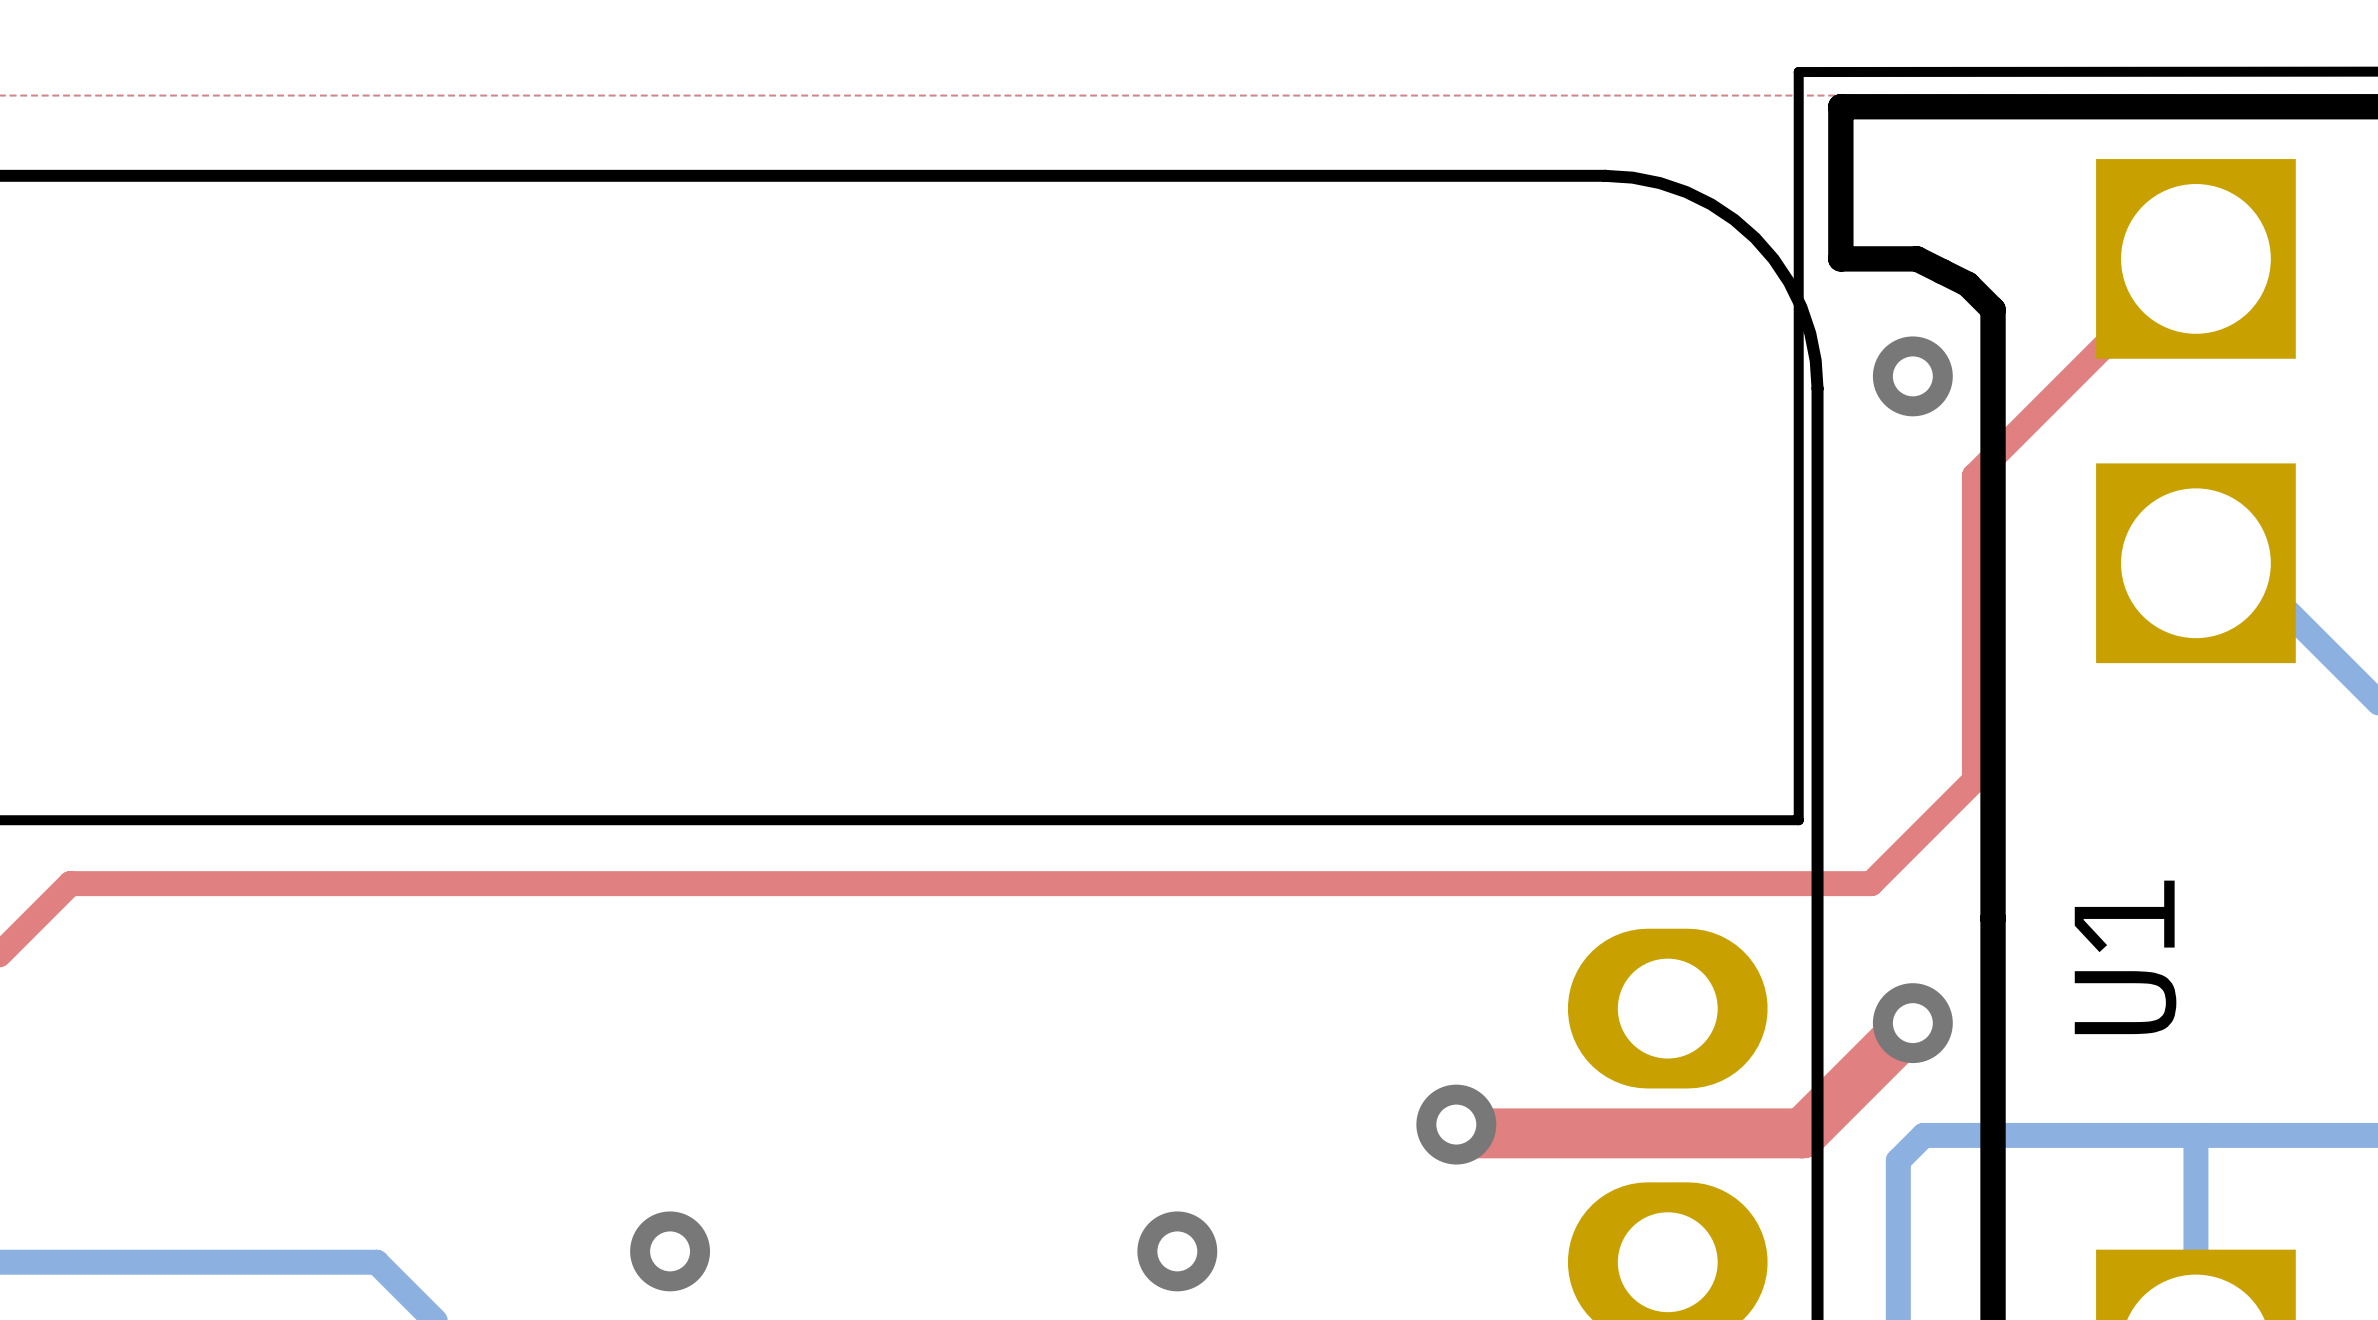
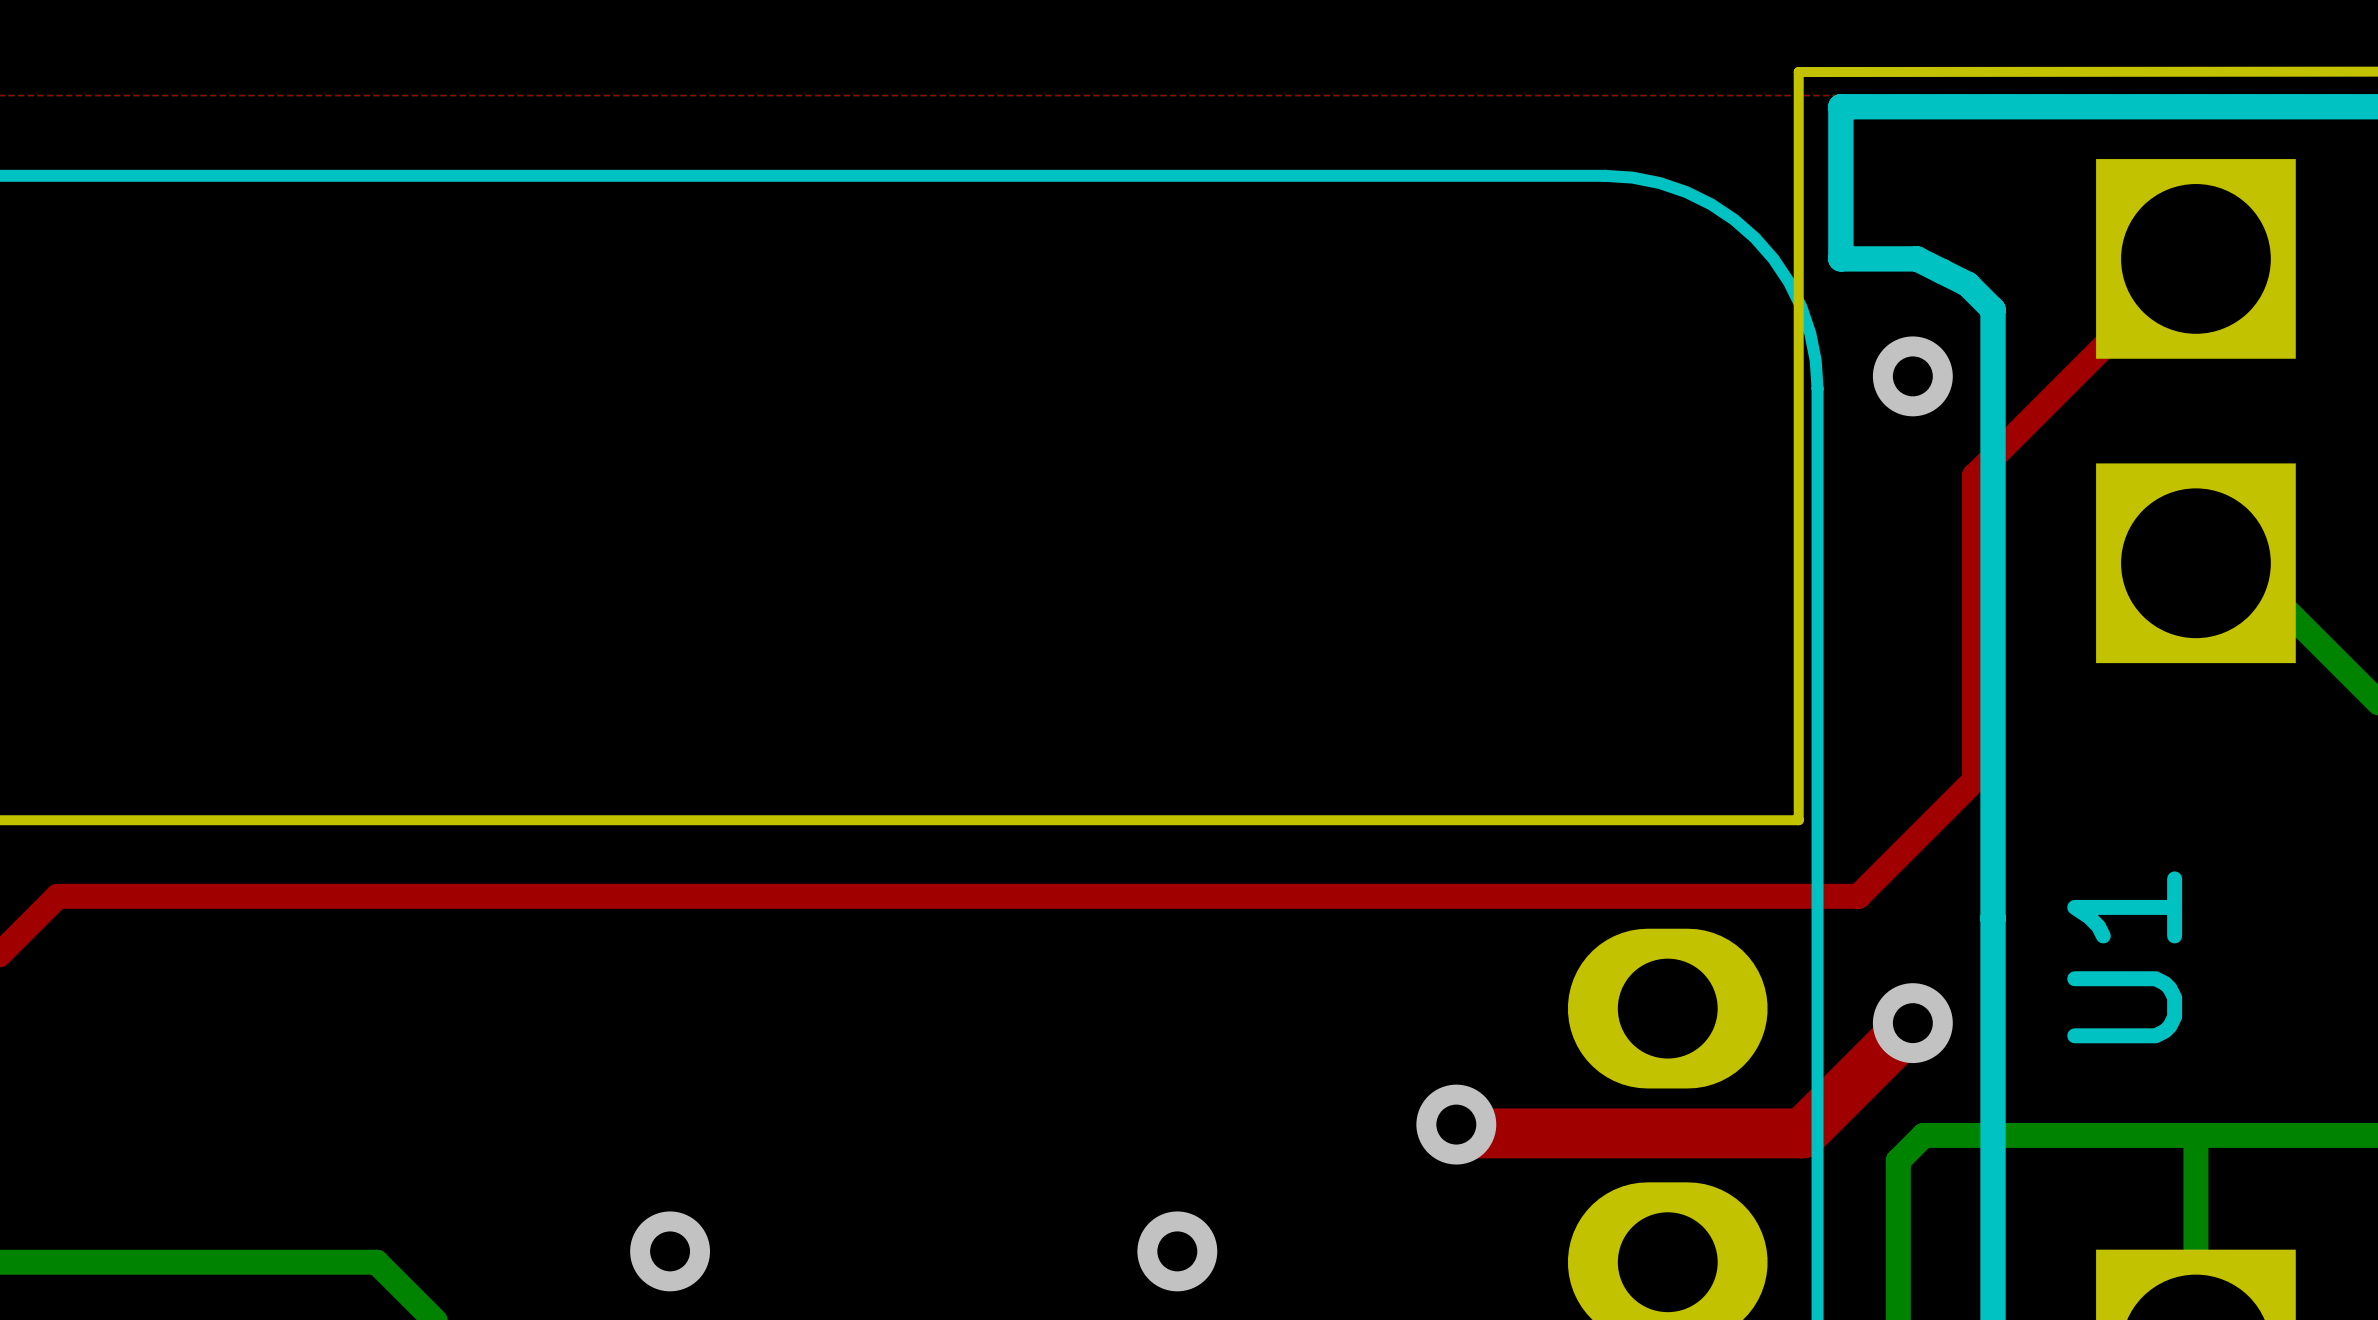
top track: (1871, 883) (70, 883) (57, 896) -> (1871, 883) (1858, 896) (57, 896)

